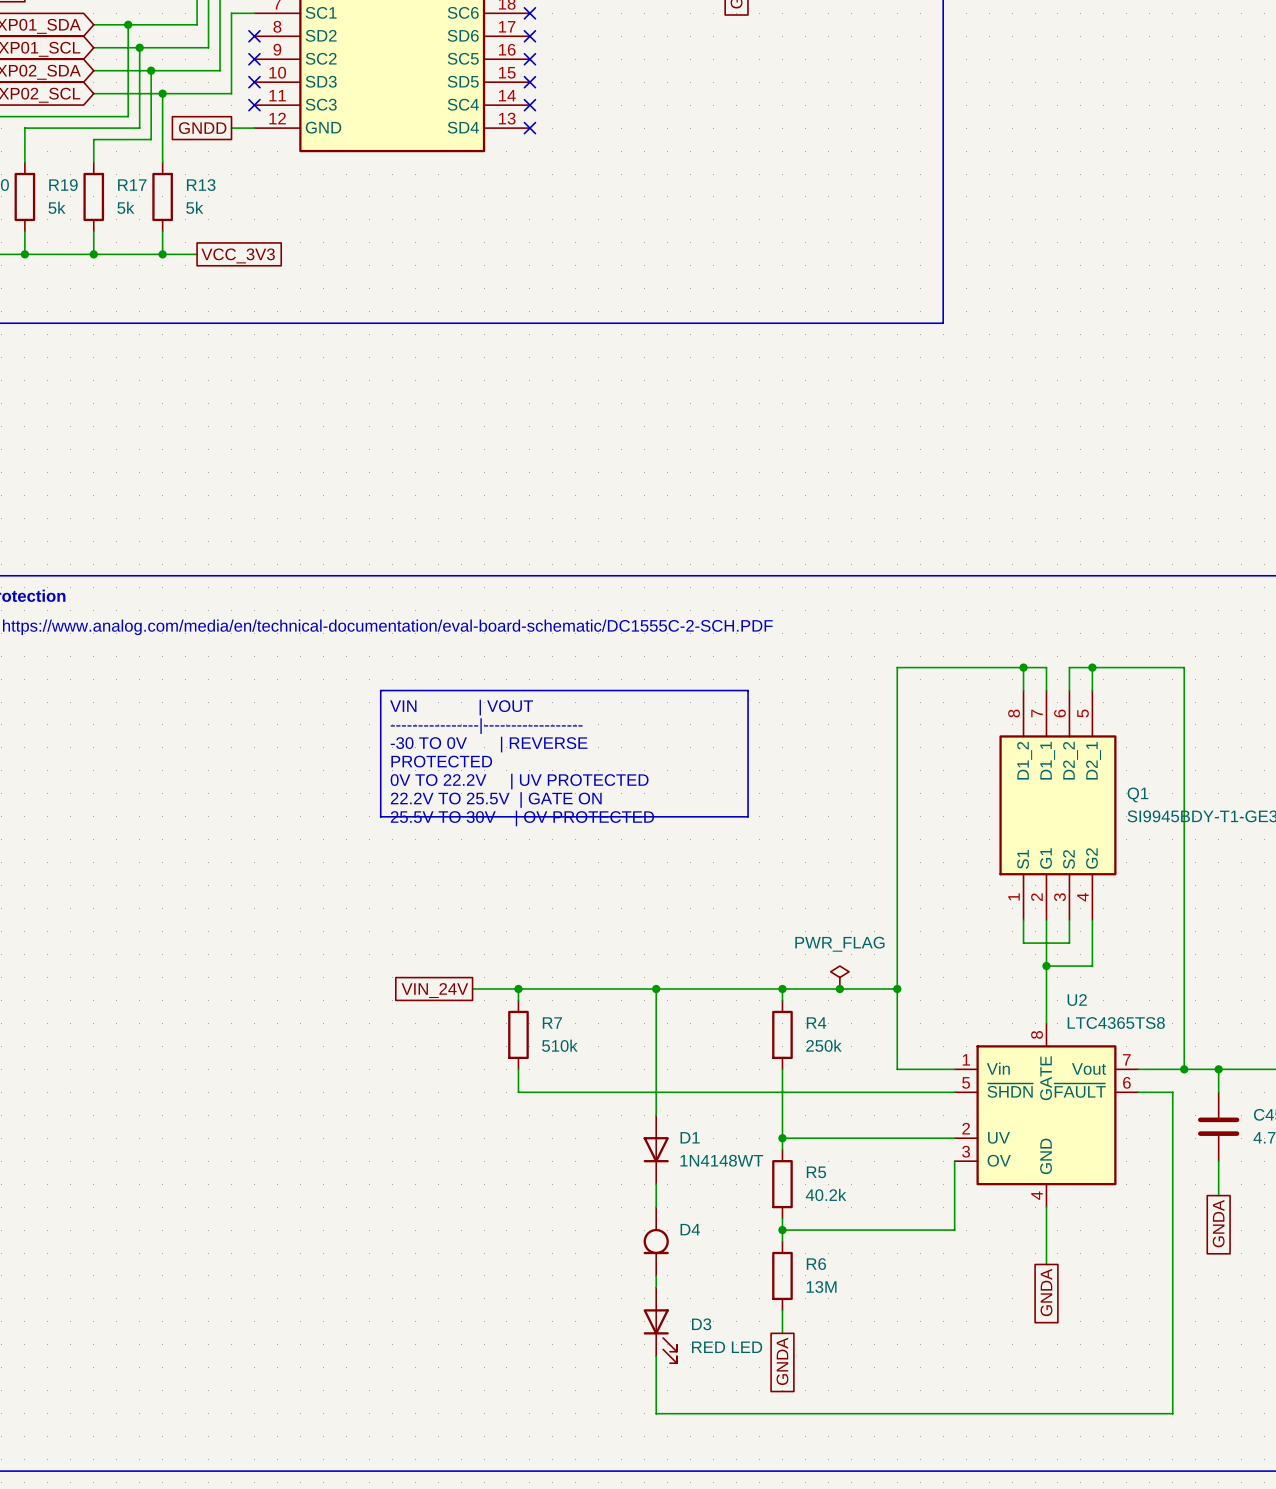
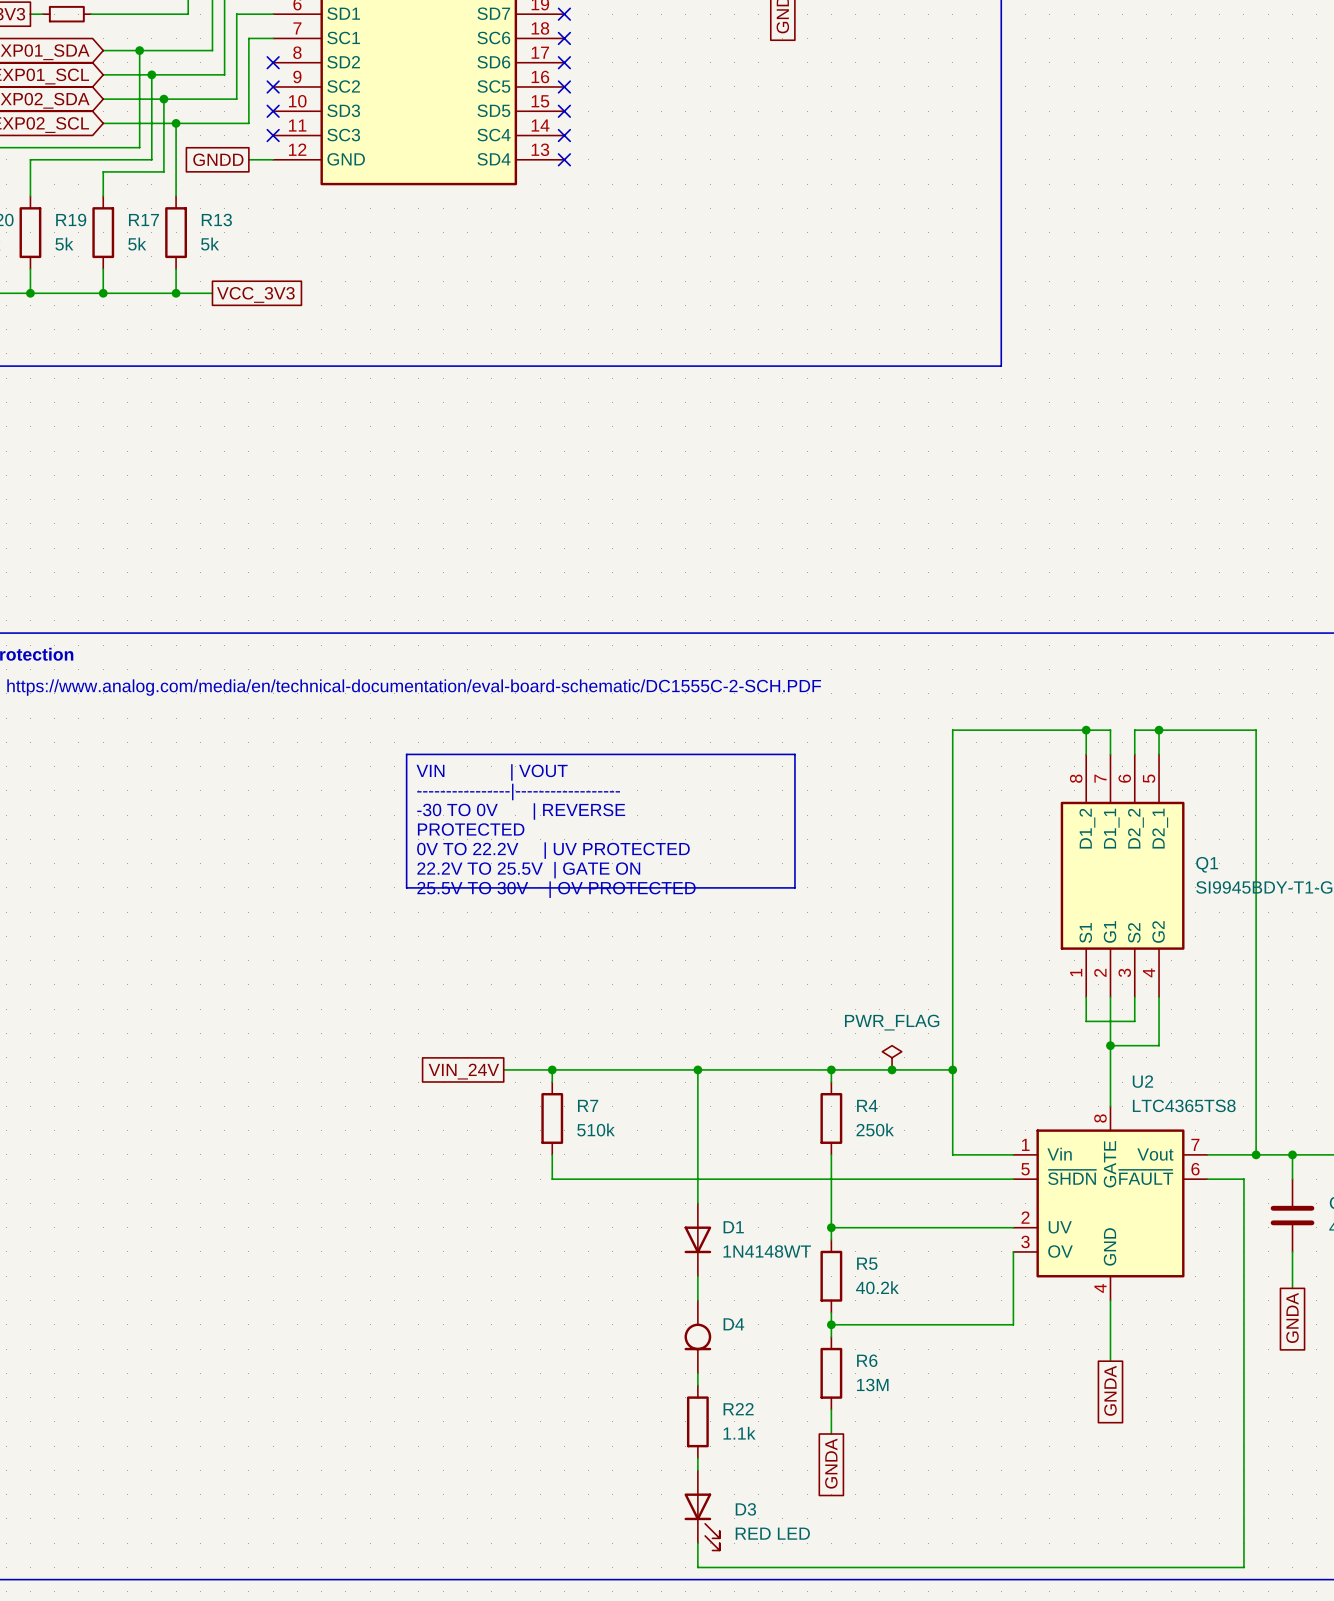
R22: none -> 1.1k (697, 1421)
D3 position: (660, 1325) -> (702, 1510)
wire: (656, 1367) (656, 1413) (1172, 1413) -> (697, 1543) (697, 1567) (1243, 1567) (1243, 1518)

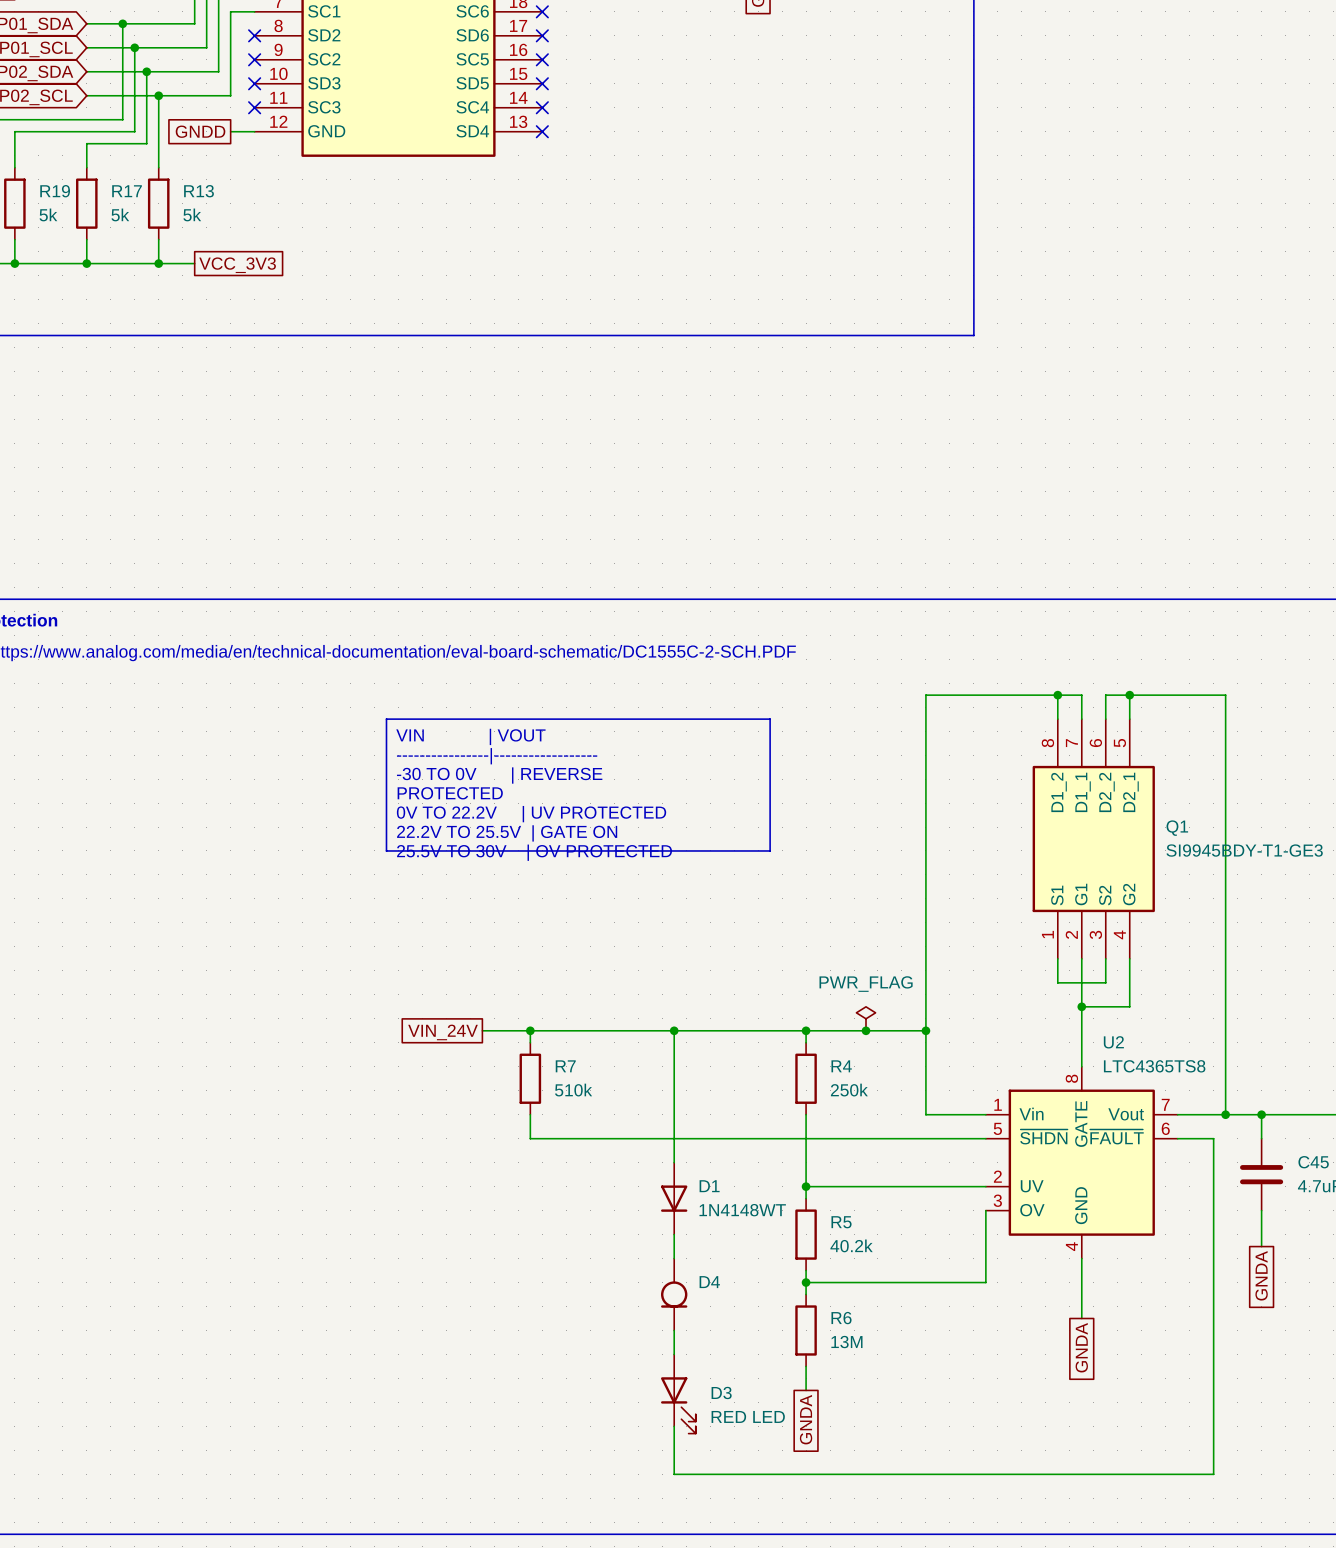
R22: 1.1k (697, 1421) -> none
D3 position: (702, 1510) -> (678, 1394)
wire: (1243, 1518) (1243, 1567) (697, 1567) (697, 1543) -> (1213, 1474) (674, 1474) (674, 1426)

